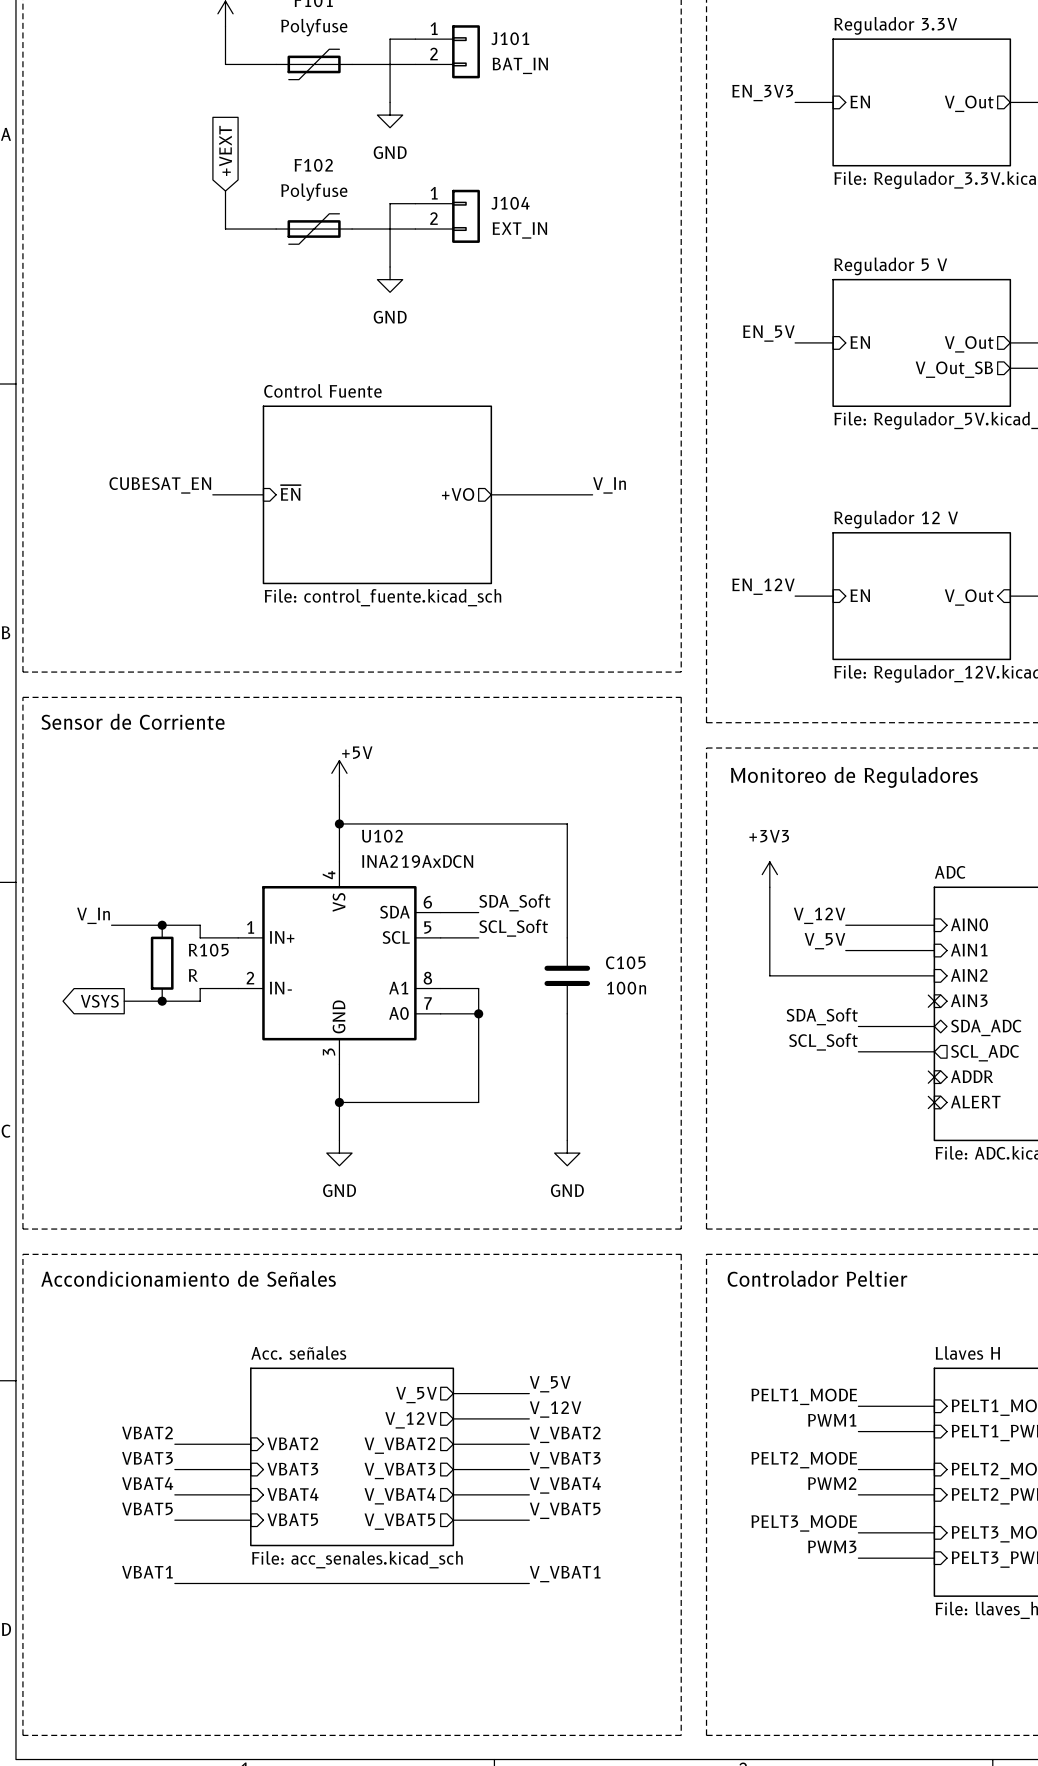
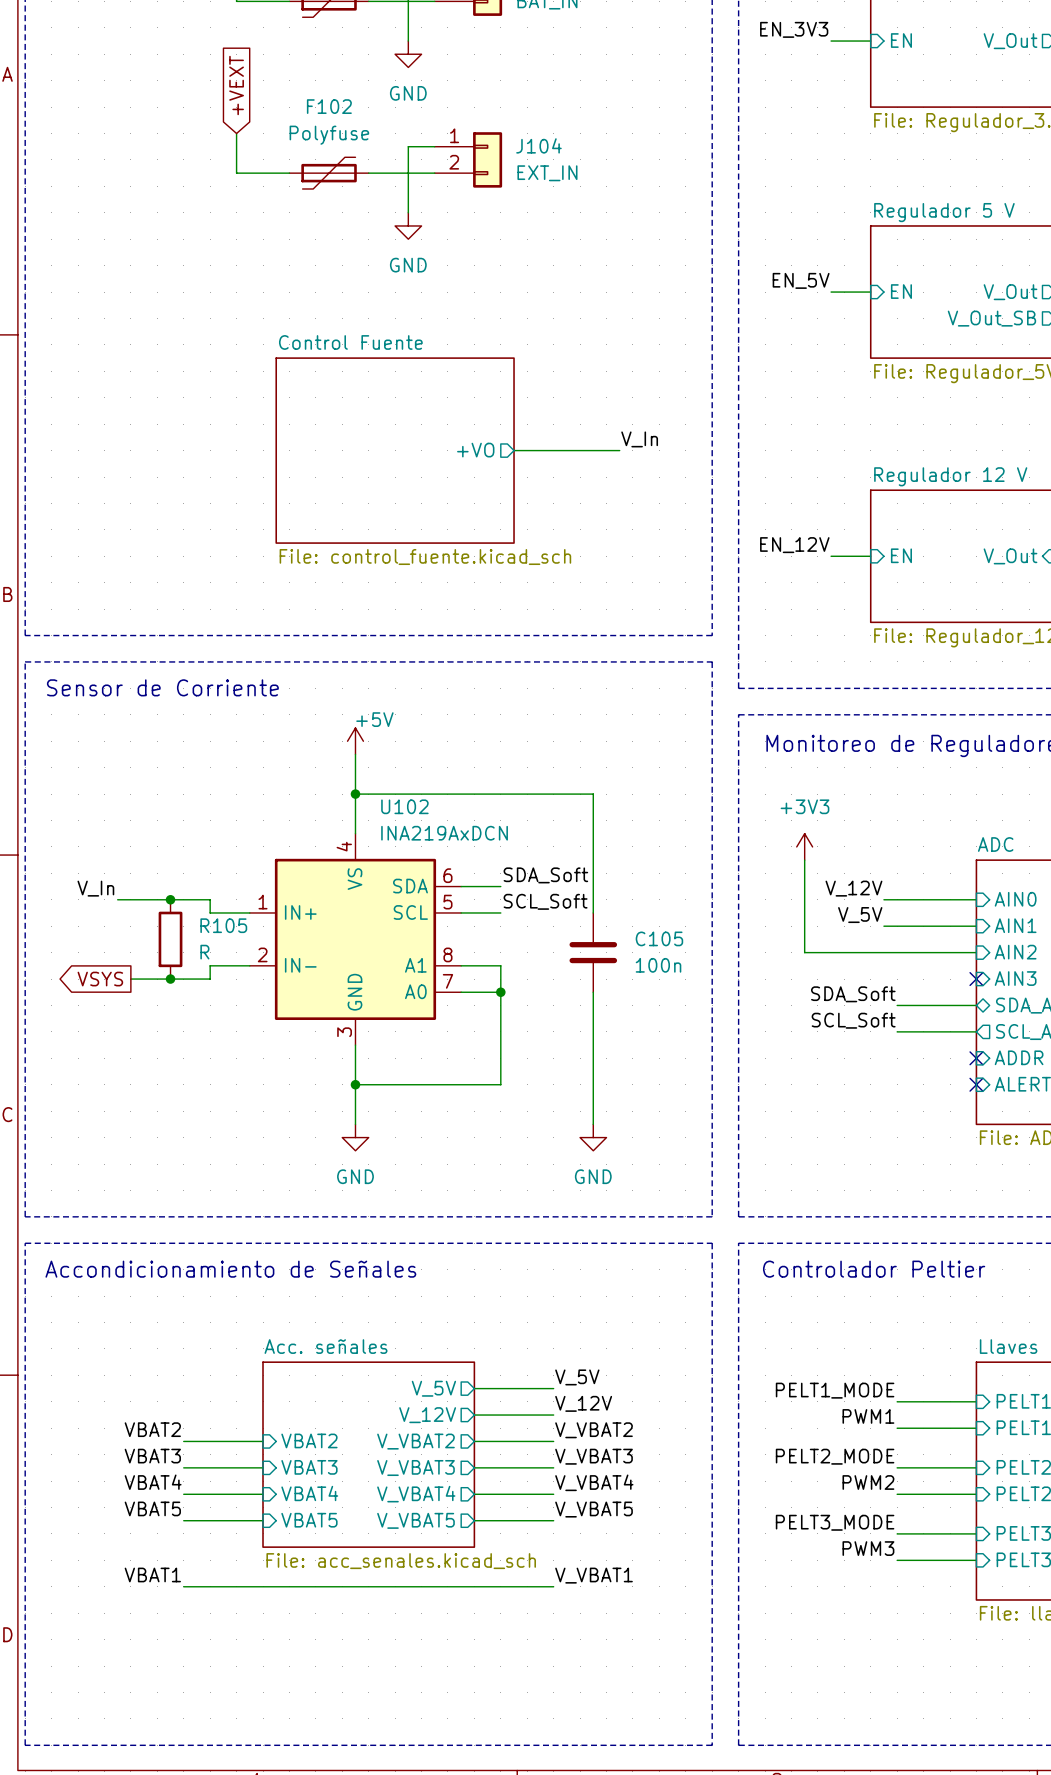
label: CUBESAT_EN (160, 485) -> none
sheet pin: ~{EN} (290, 492) -> none
wire: (212, 494) (263, 494) -> none

